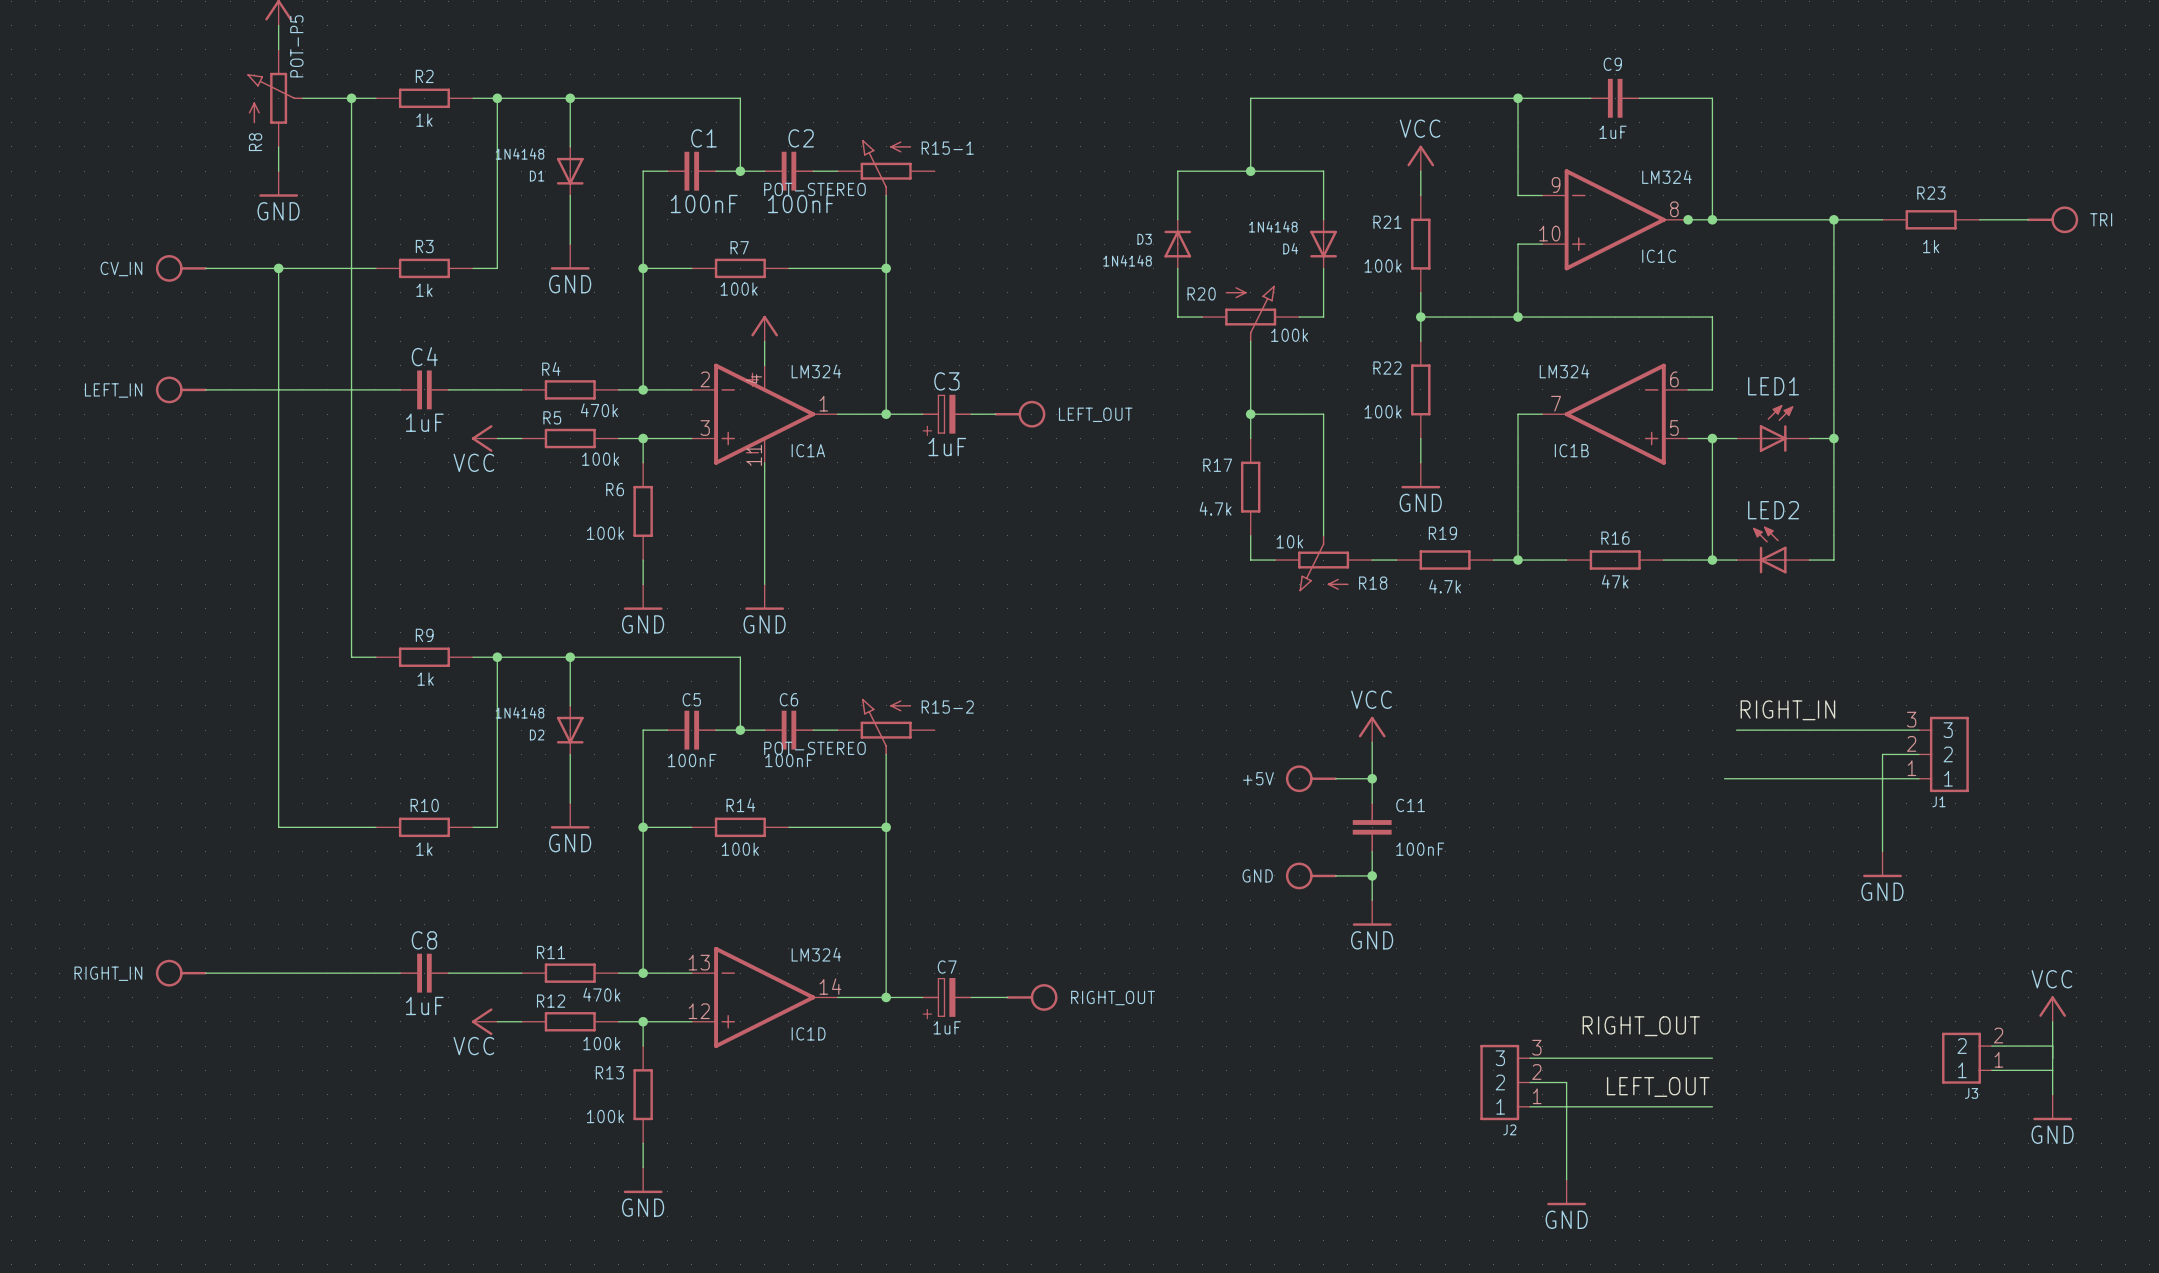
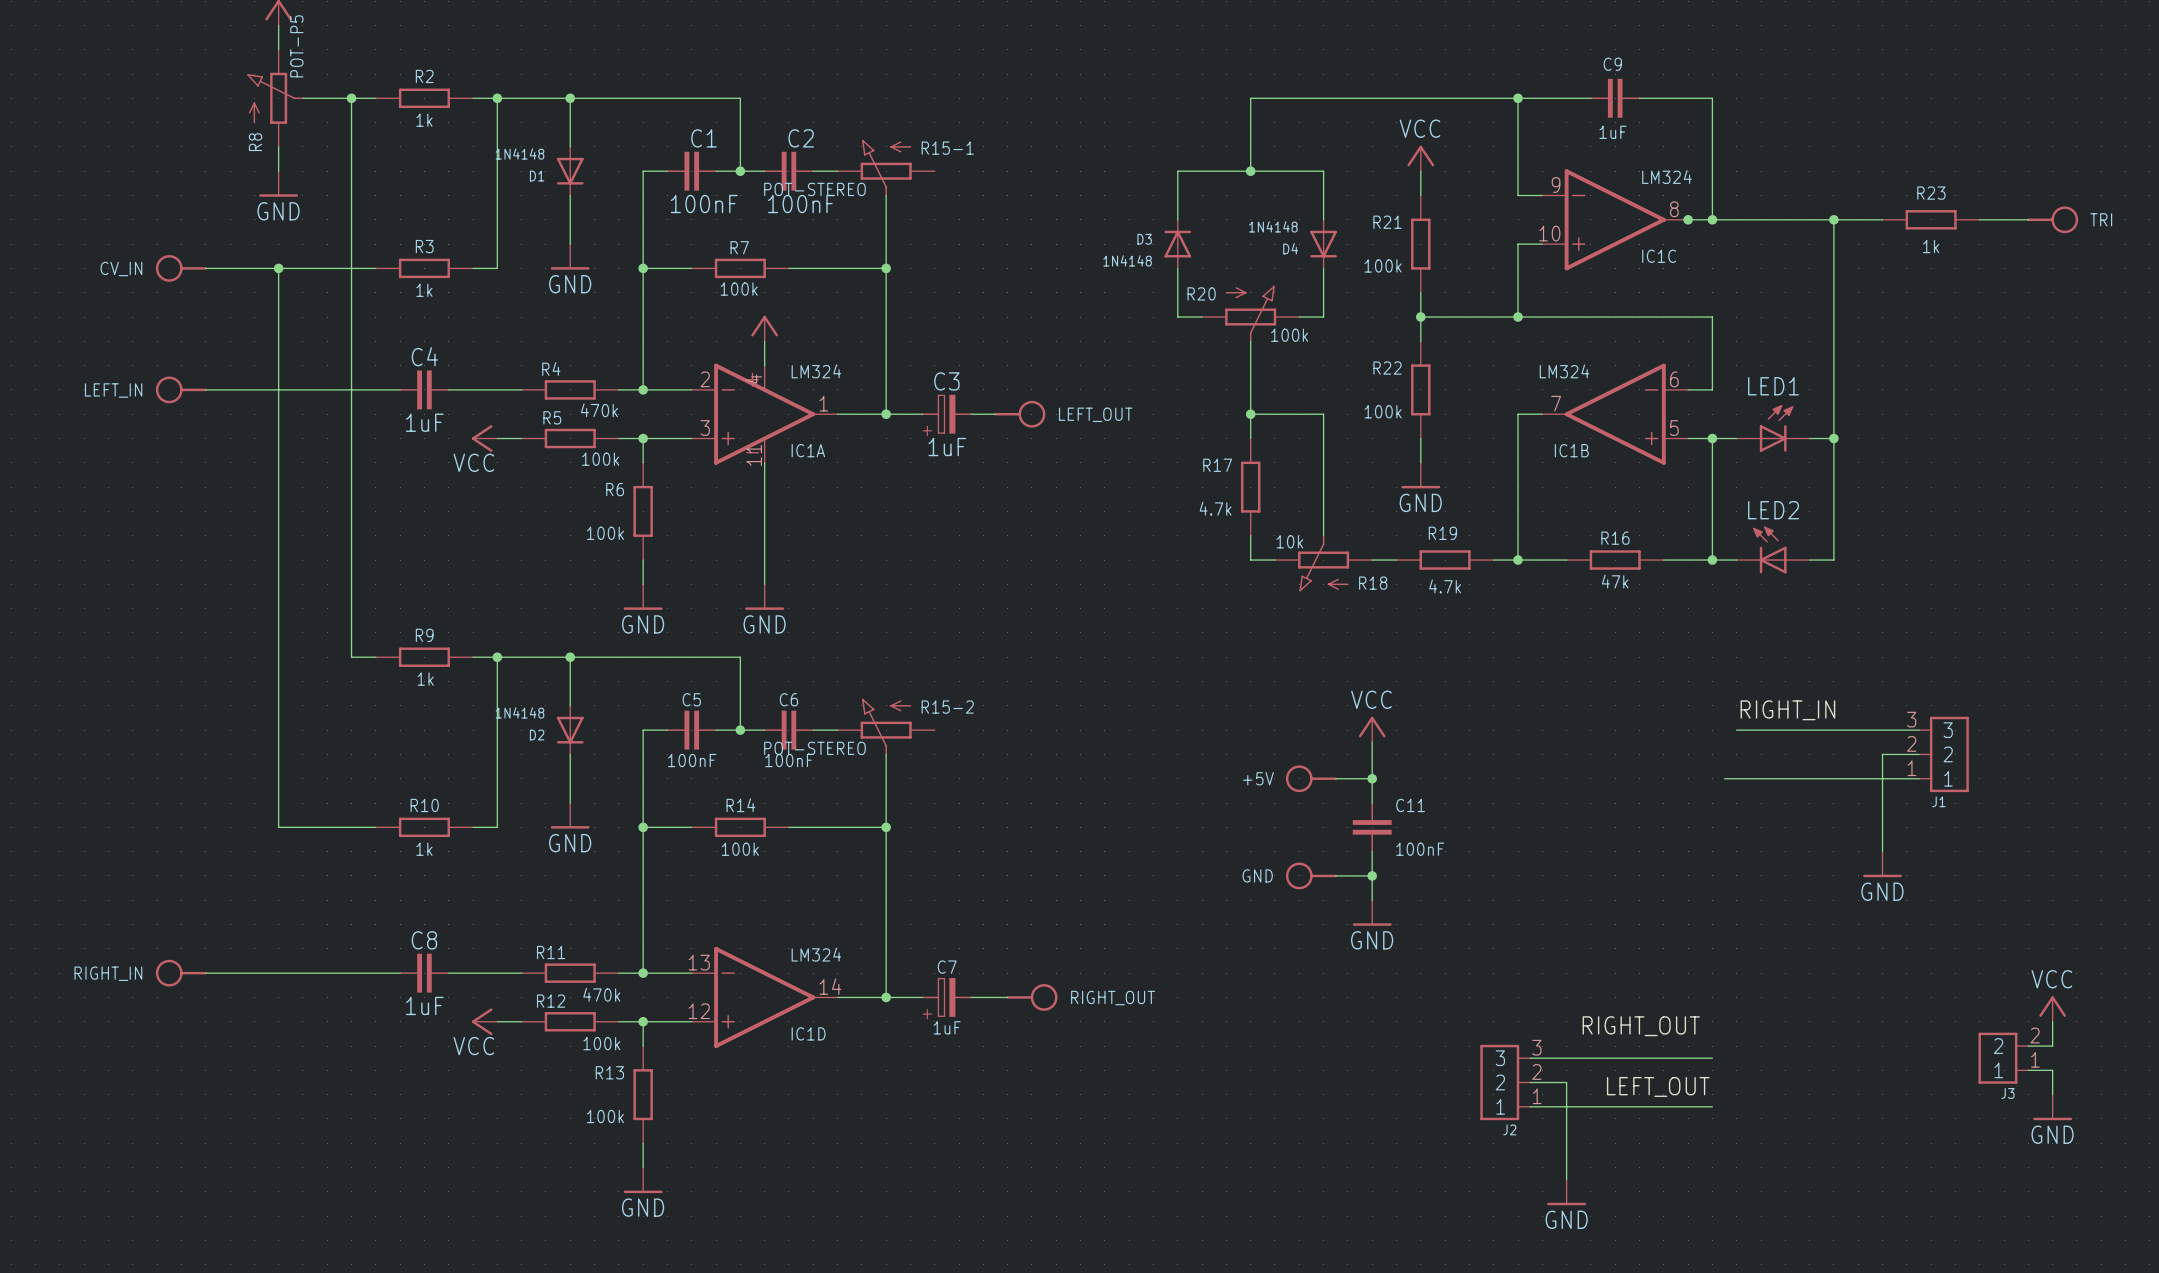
wire: (1991, 1046) (2028, 1046) -> none
wire: (2052, 1046) (2052, 1070) -> none
J3 position: (1967, 1058) -> (2003, 1058)
wire: (1991, 1070) (2028, 1070) -> none

